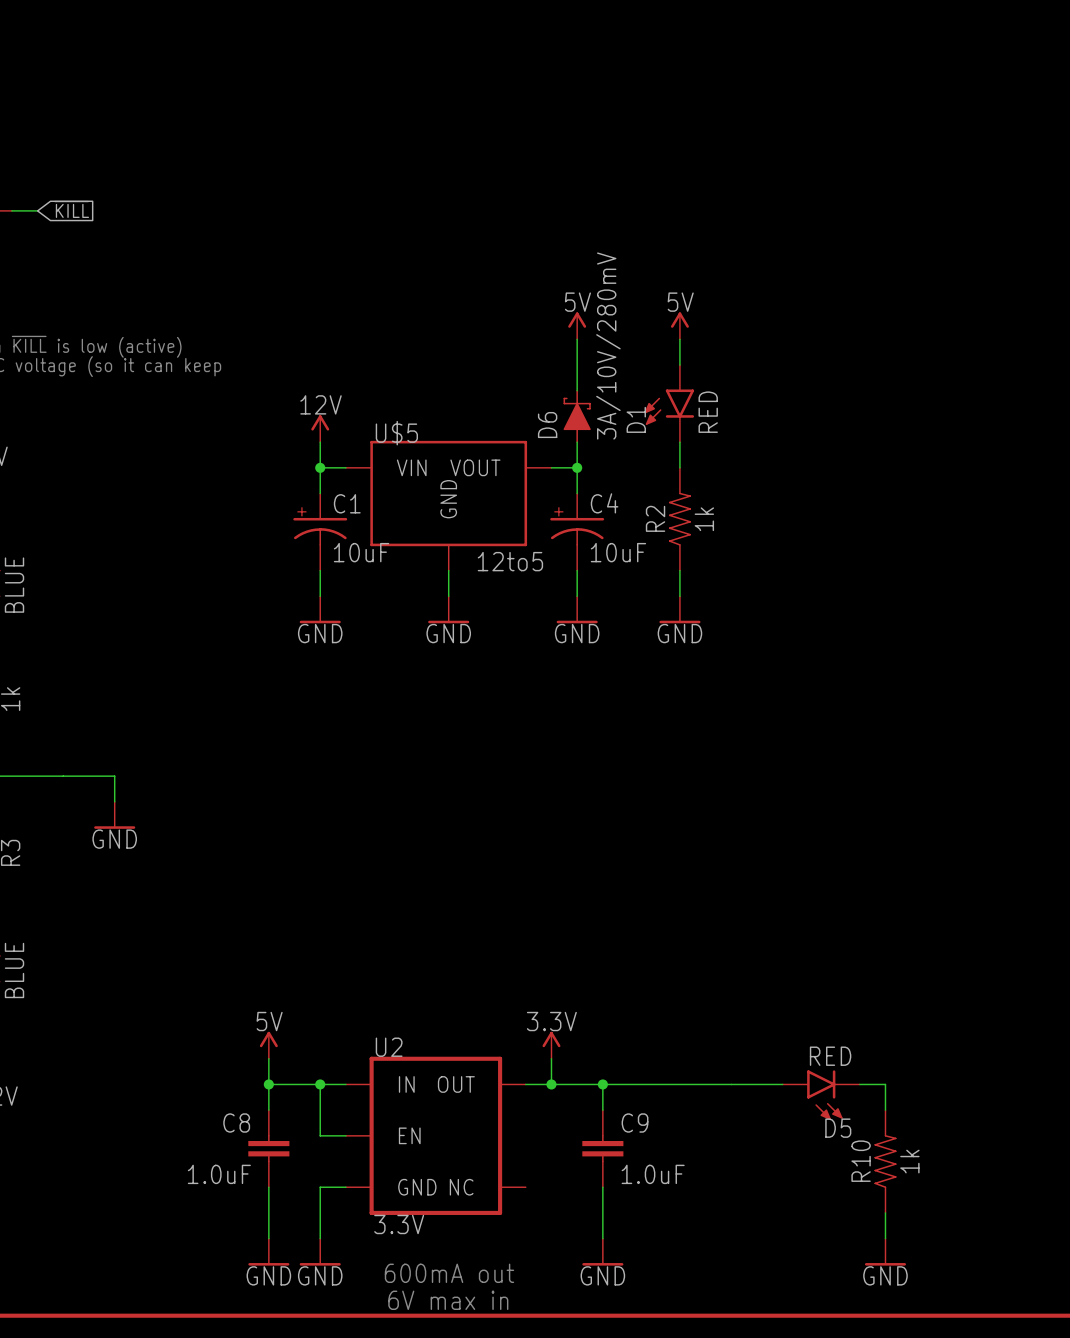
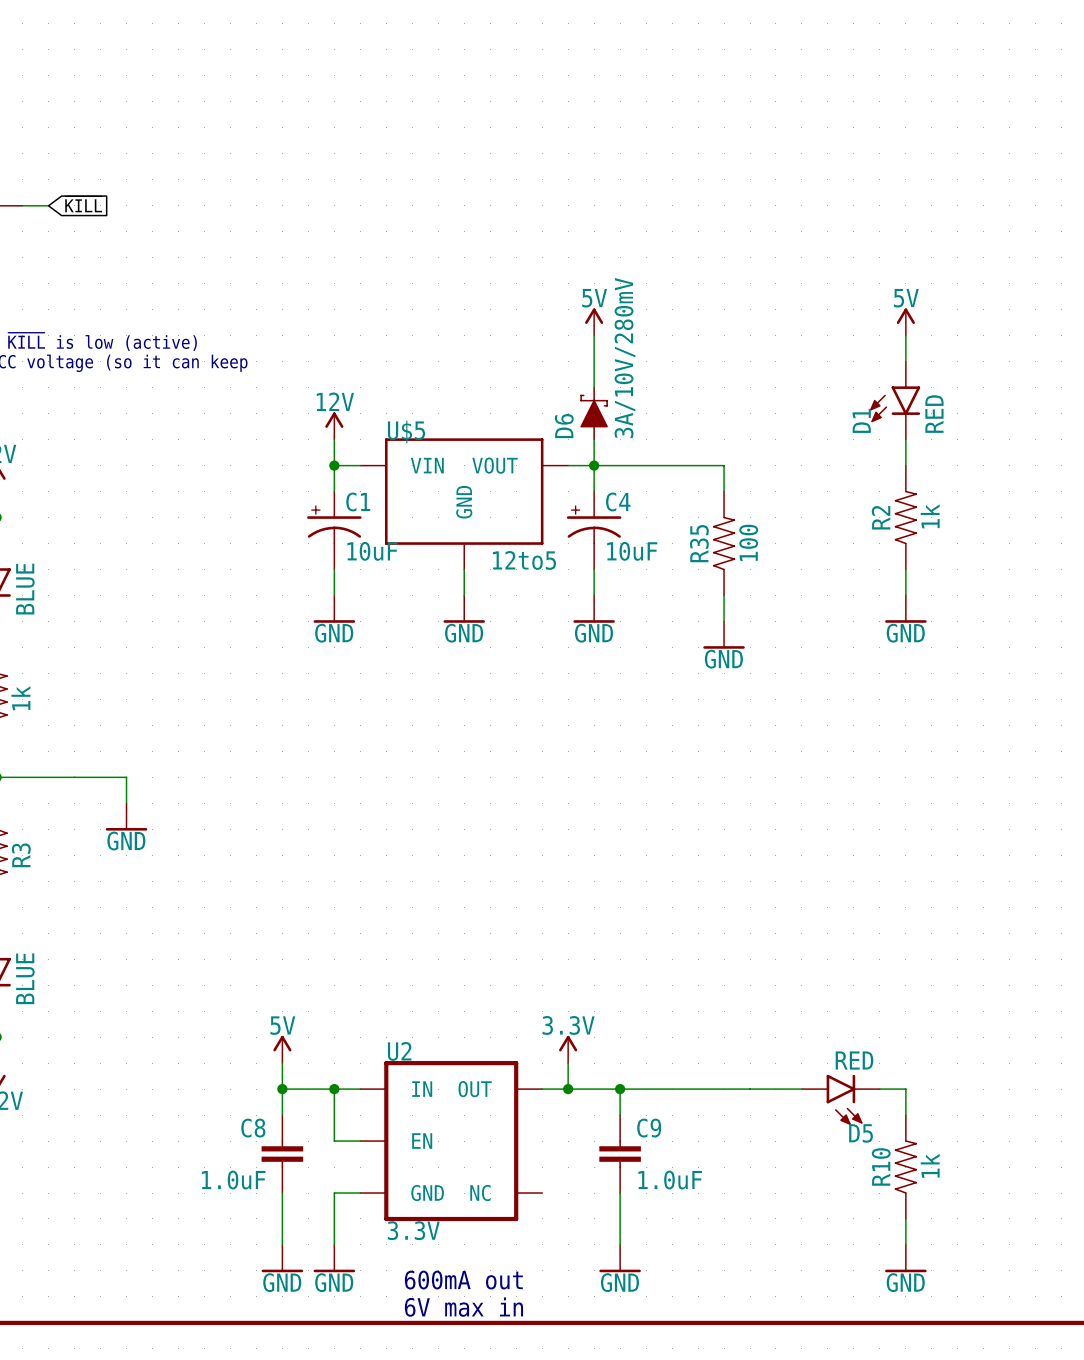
power symbol position: 5V (679, 325) -> 5V (905, 322)
wire: (679, 339) (679, 365) -> (905, 335) (905, 361)
D1 position: (669, 403) -> (895, 400)
wire: (679, 442) (679, 467) -> (905, 439) (905, 465)
wire: none -> (594, 465) (724, 465) (724, 491)
R2 position: (679, 519) -> (905, 517)
R35: none -> 100 (724, 543)
wire: (679, 570) (679, 596) -> (724, 595) (724, 621)
wire: none -> (905, 569) (905, 595)
power symbol position: GND (679, 609) -> GND (724, 635)
power symbol: none -> GND (905, 609)

